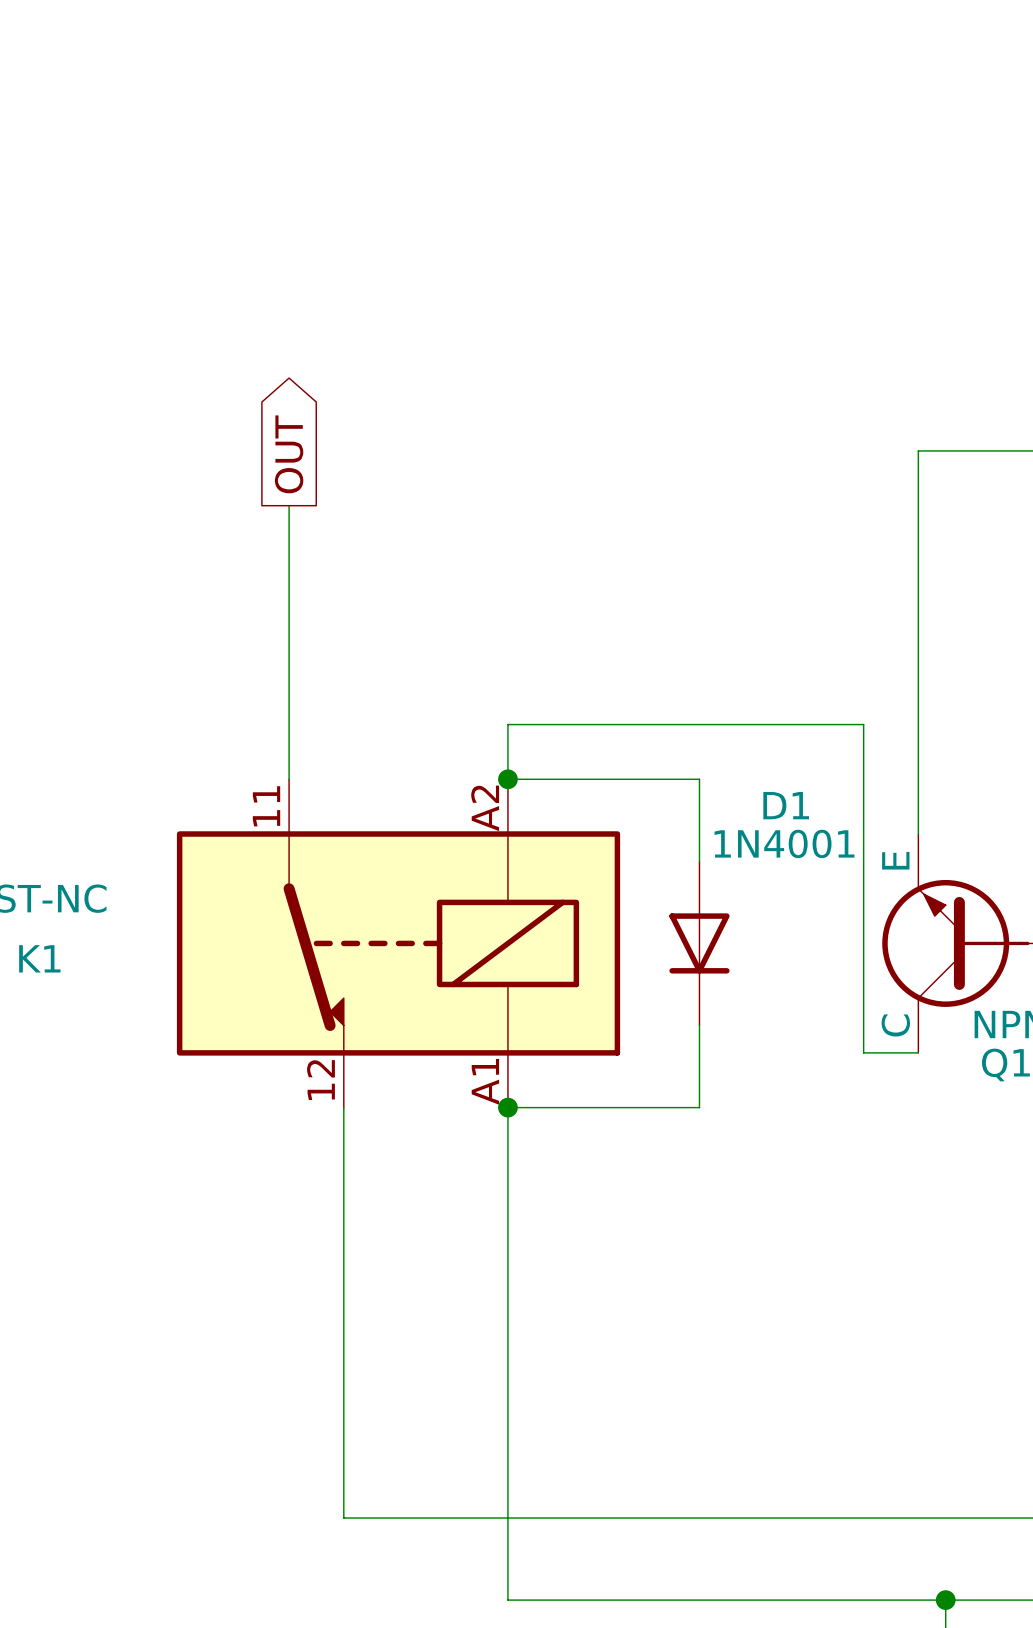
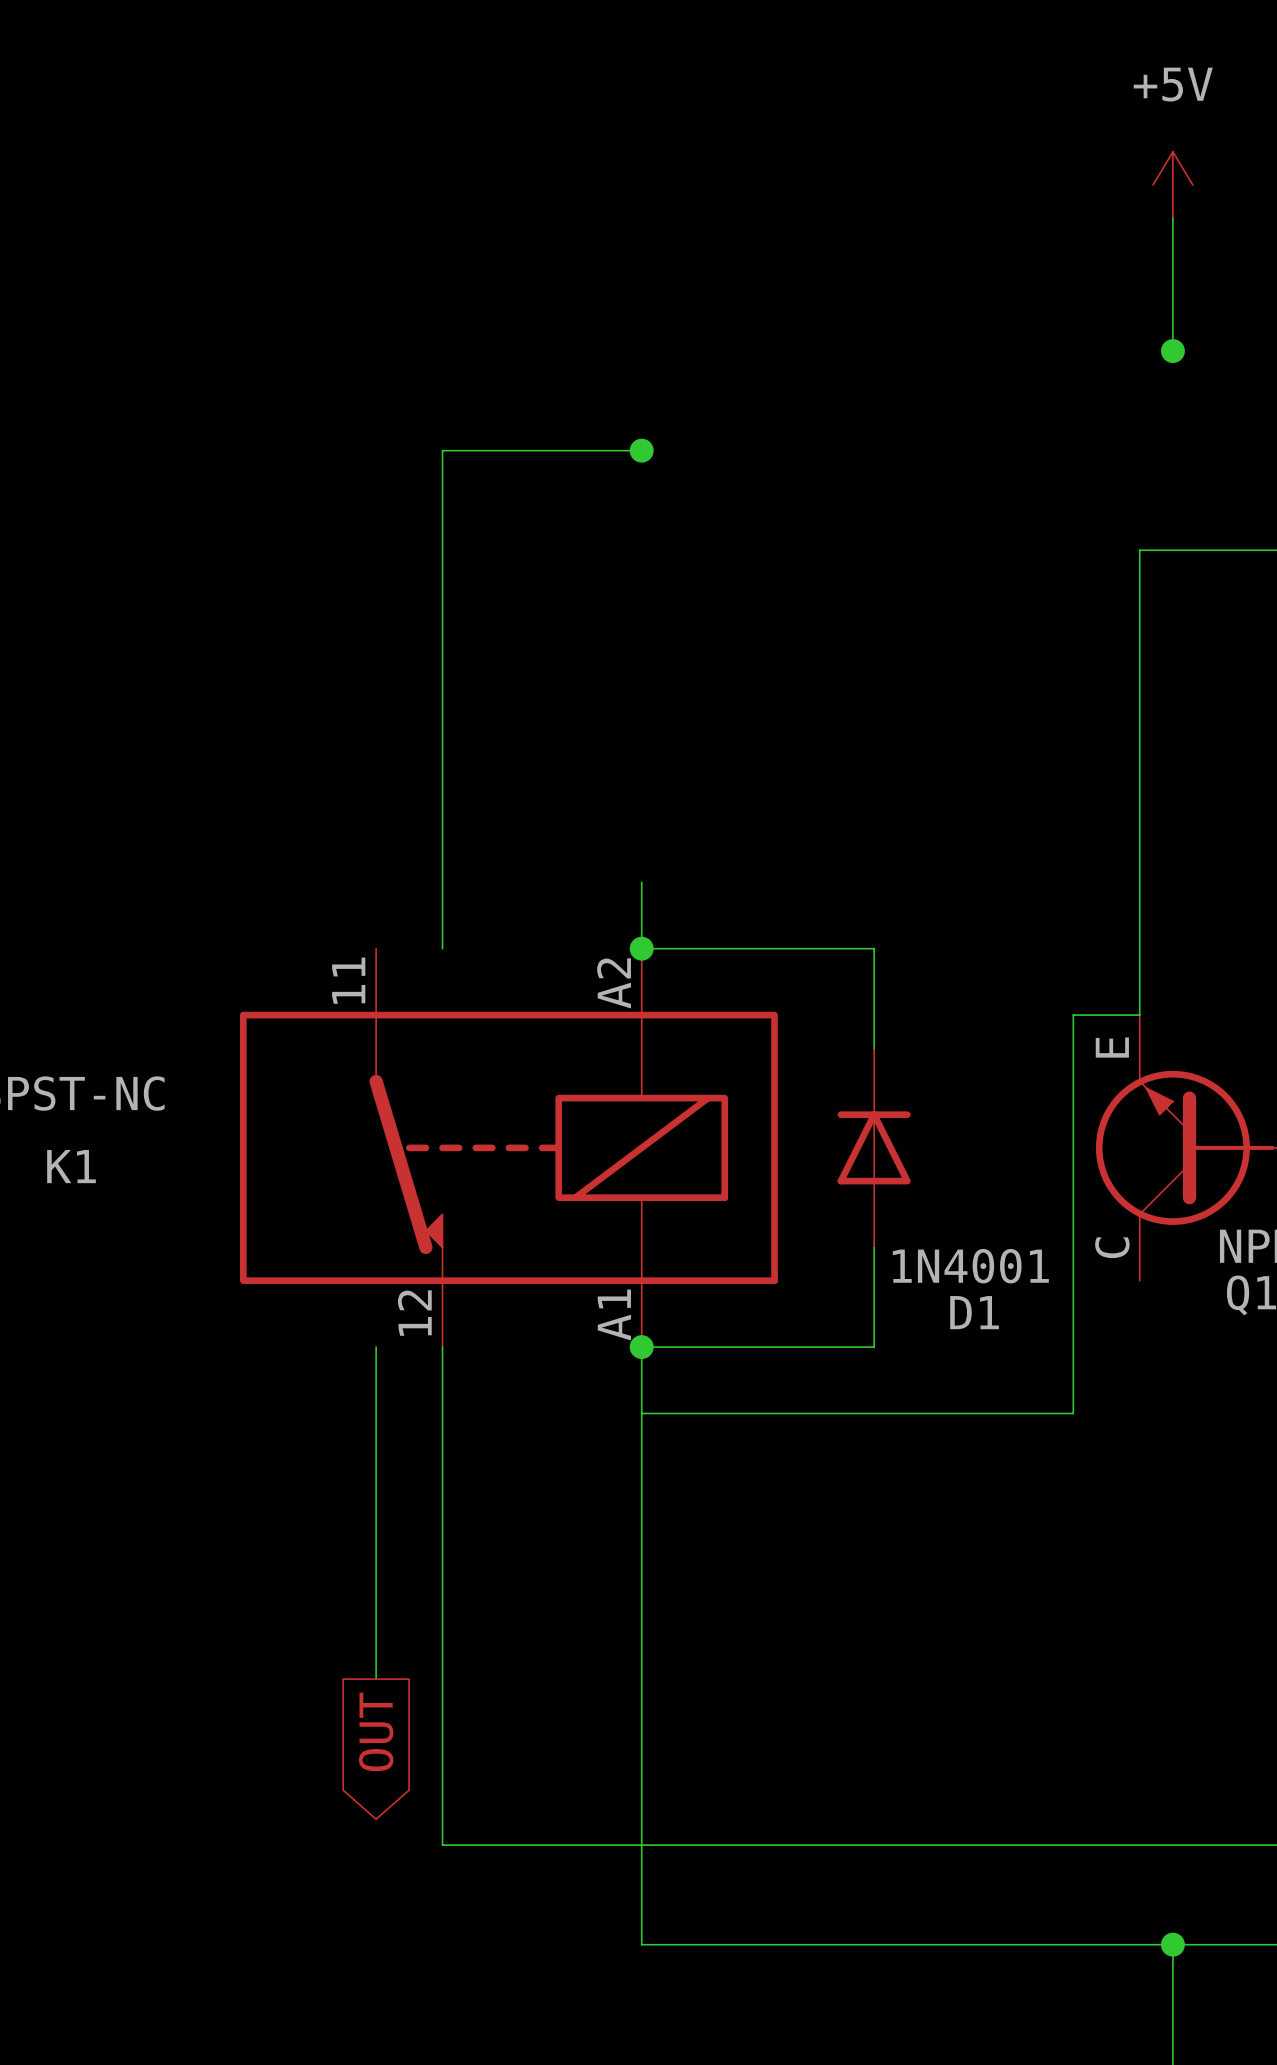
power symbol: none -> +5V (1172, 185)
wire: none -> (1172, 218) (1172, 351)
junction: none -> (1172, 351)
wire: none -> (641, 450) (442, 450) (442, 948)
junction: none -> (641, 450)
global label: OUT (289, 454) -> none
wire: (289, 505) (289, 779) -> none
wire: (507, 724) (863, 724) (863, 834) -> (1139, 1015) (1073, 1015)
D1 name position: D1 (786, 805) -> D1 (974, 1312)
D1 value position: 1N4001 (784, 843) -> 1N4001 (970, 1266)
D1 rotation: 0° (699, 943) -> 180° (874, 1147)
wire: (863, 1052) (918, 1052) -> (1073, 1280) (1073, 1413) (641, 1413)
wire: none -> (376, 1347) (376, 1679)
global label: none -> OUT (376, 1731)

